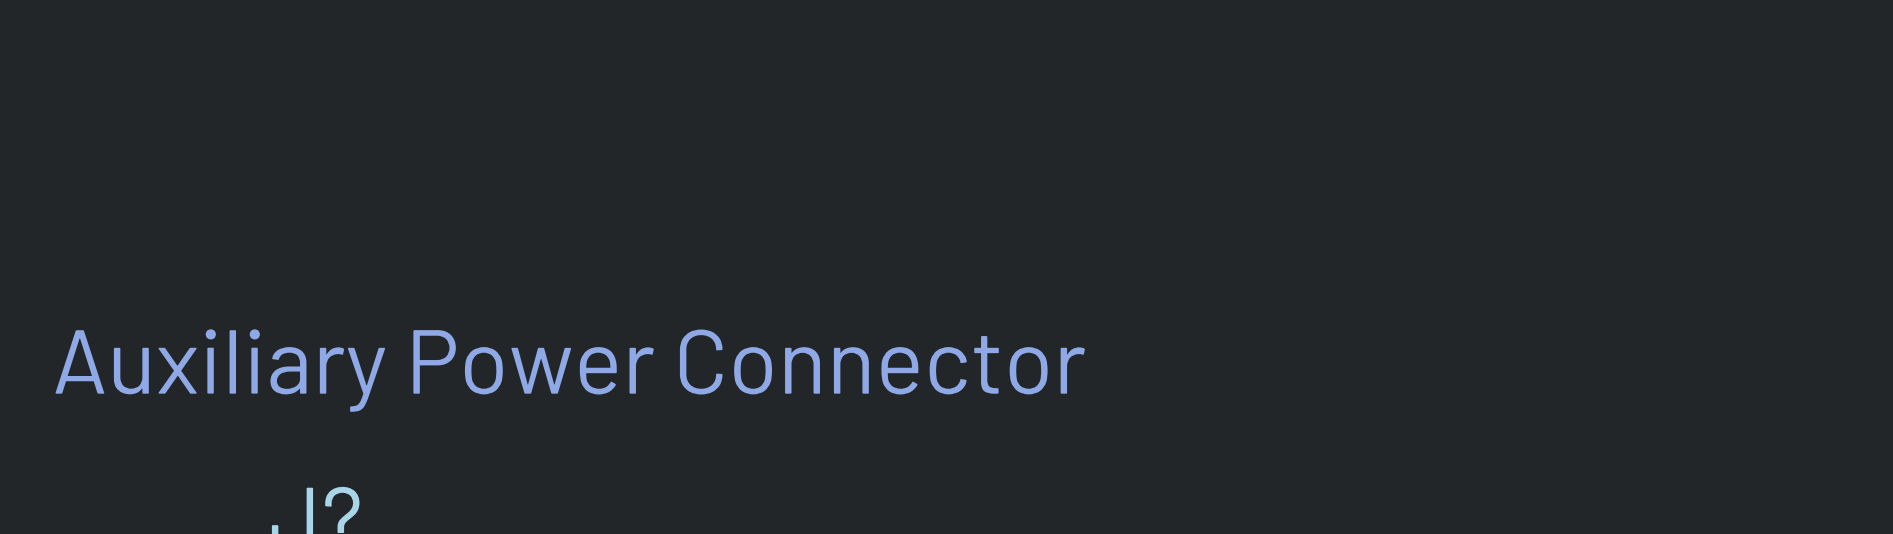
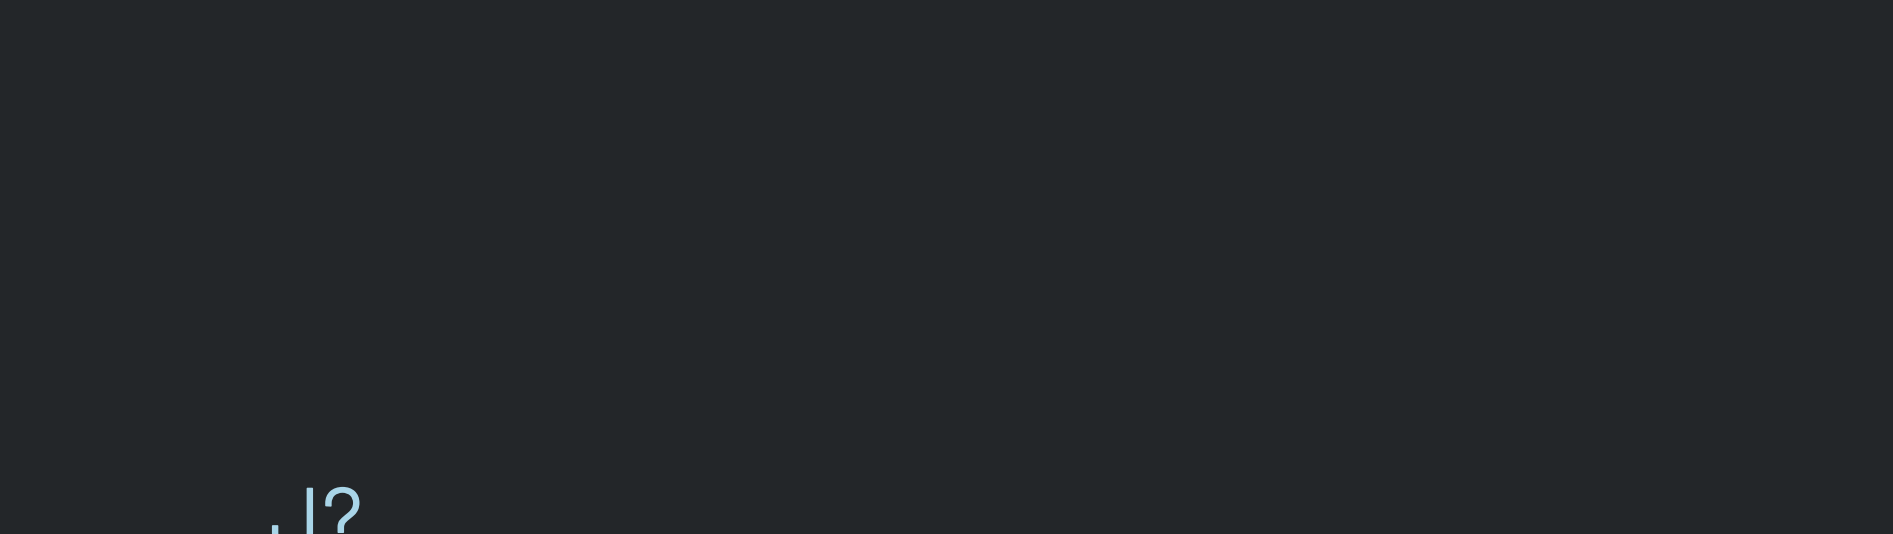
text: Auxiliary Power Connector (570, 370) -> none

